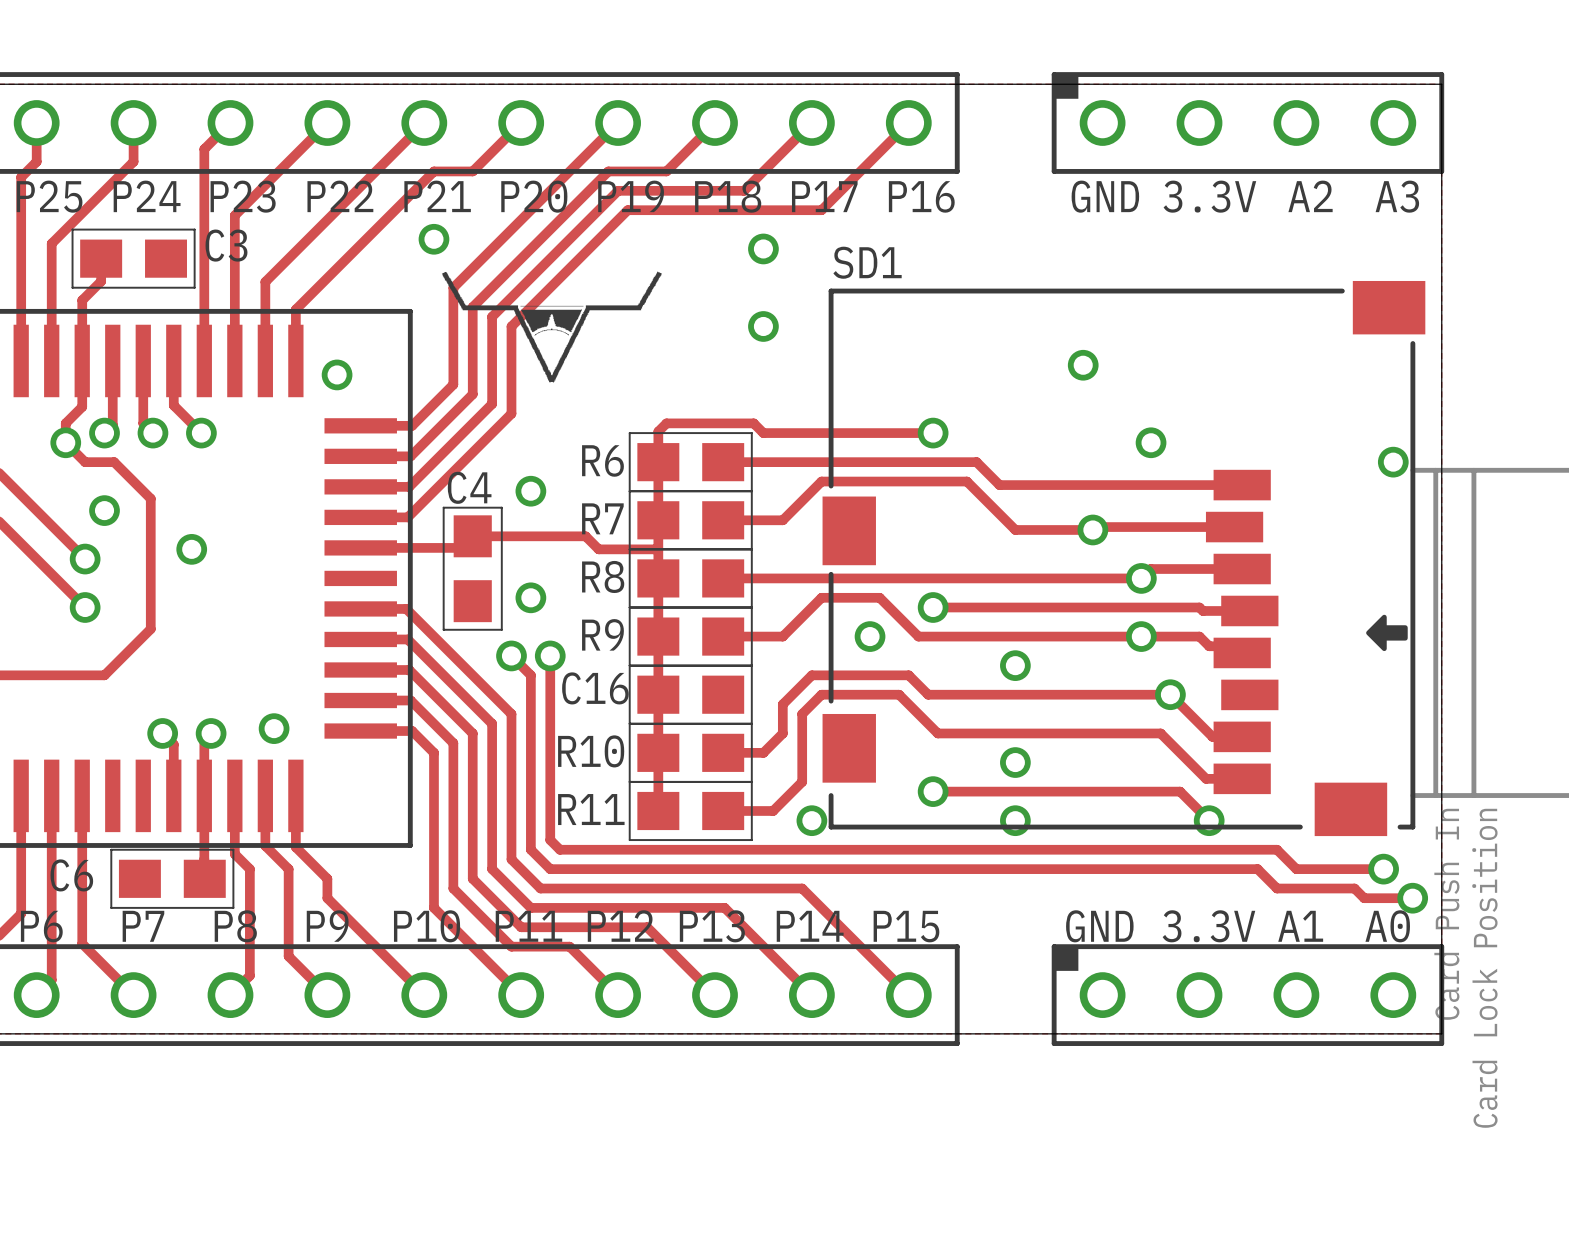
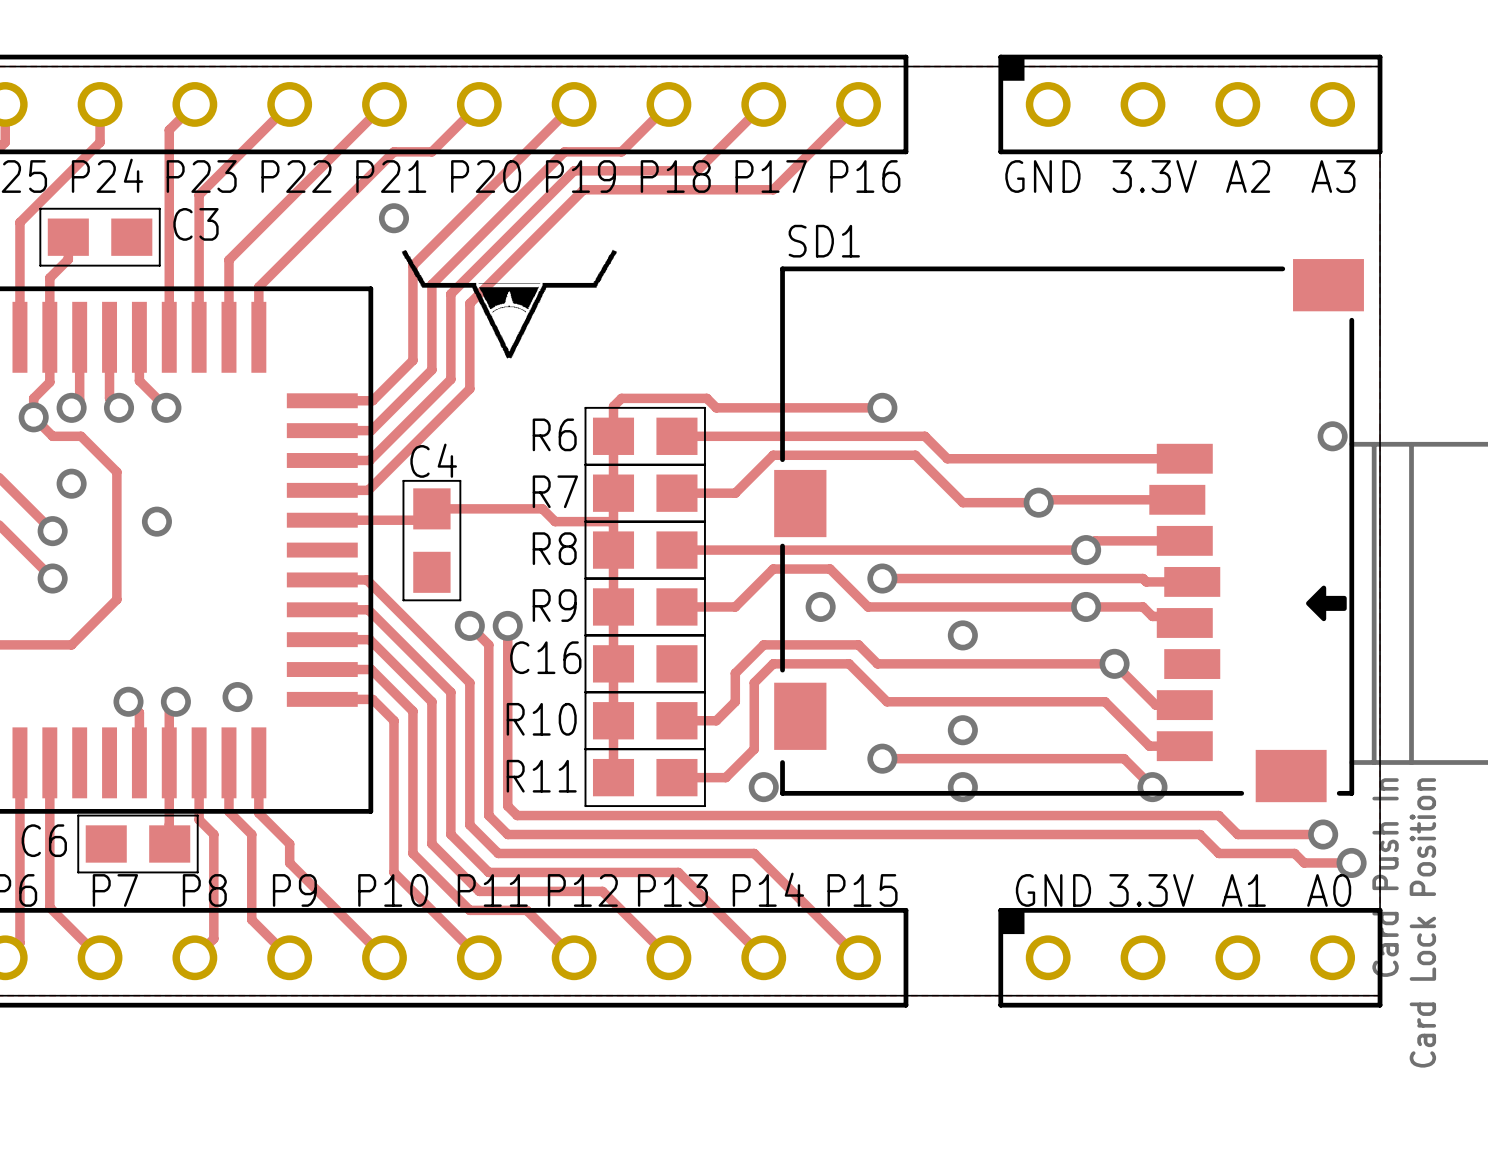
via: (763, 248) -> none
via: (763, 326) -> none
via: (1083, 365) -> none
via: (337, 374) -> none
via: (1151, 442) -> none
via: (530, 491) -> none
via: (530, 597) -> none

